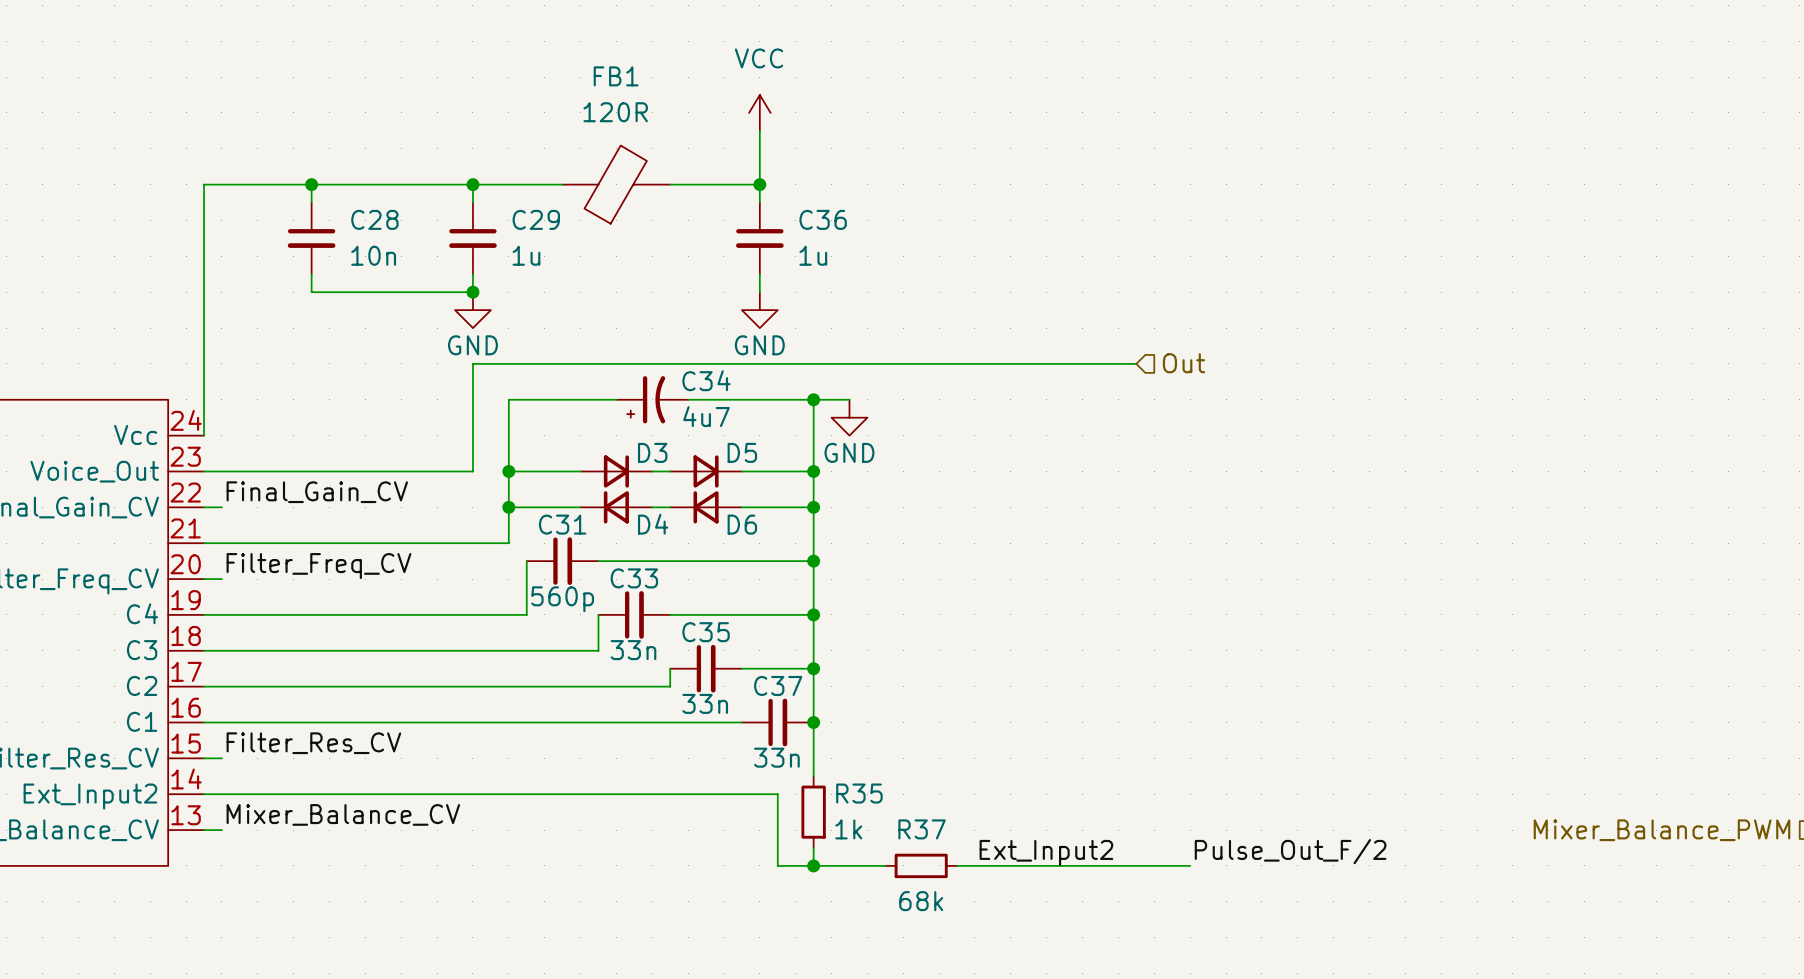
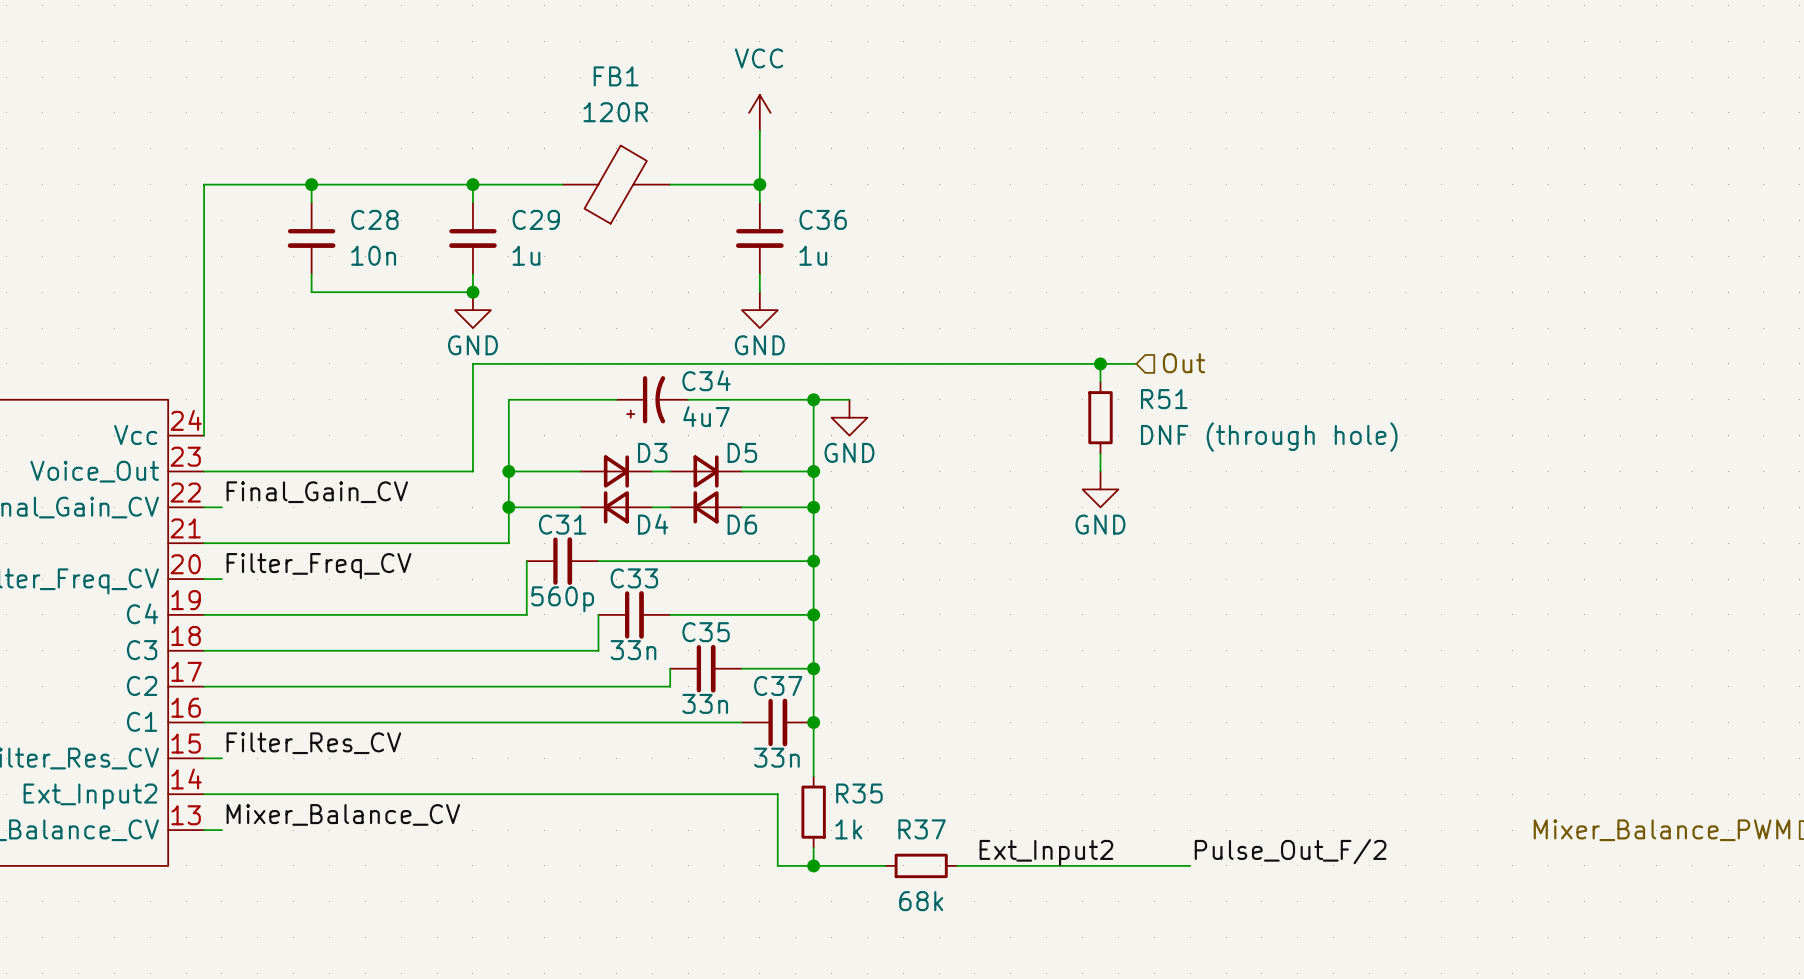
wire: none -> (1100, 363) (1100, 381)
junction: none -> (1100, 363)
R51: none -> DNF (through hole) (1100, 417)
wire: none -> (1100, 453) (1100, 471)
power symbol: none -> GND (1100, 489)

